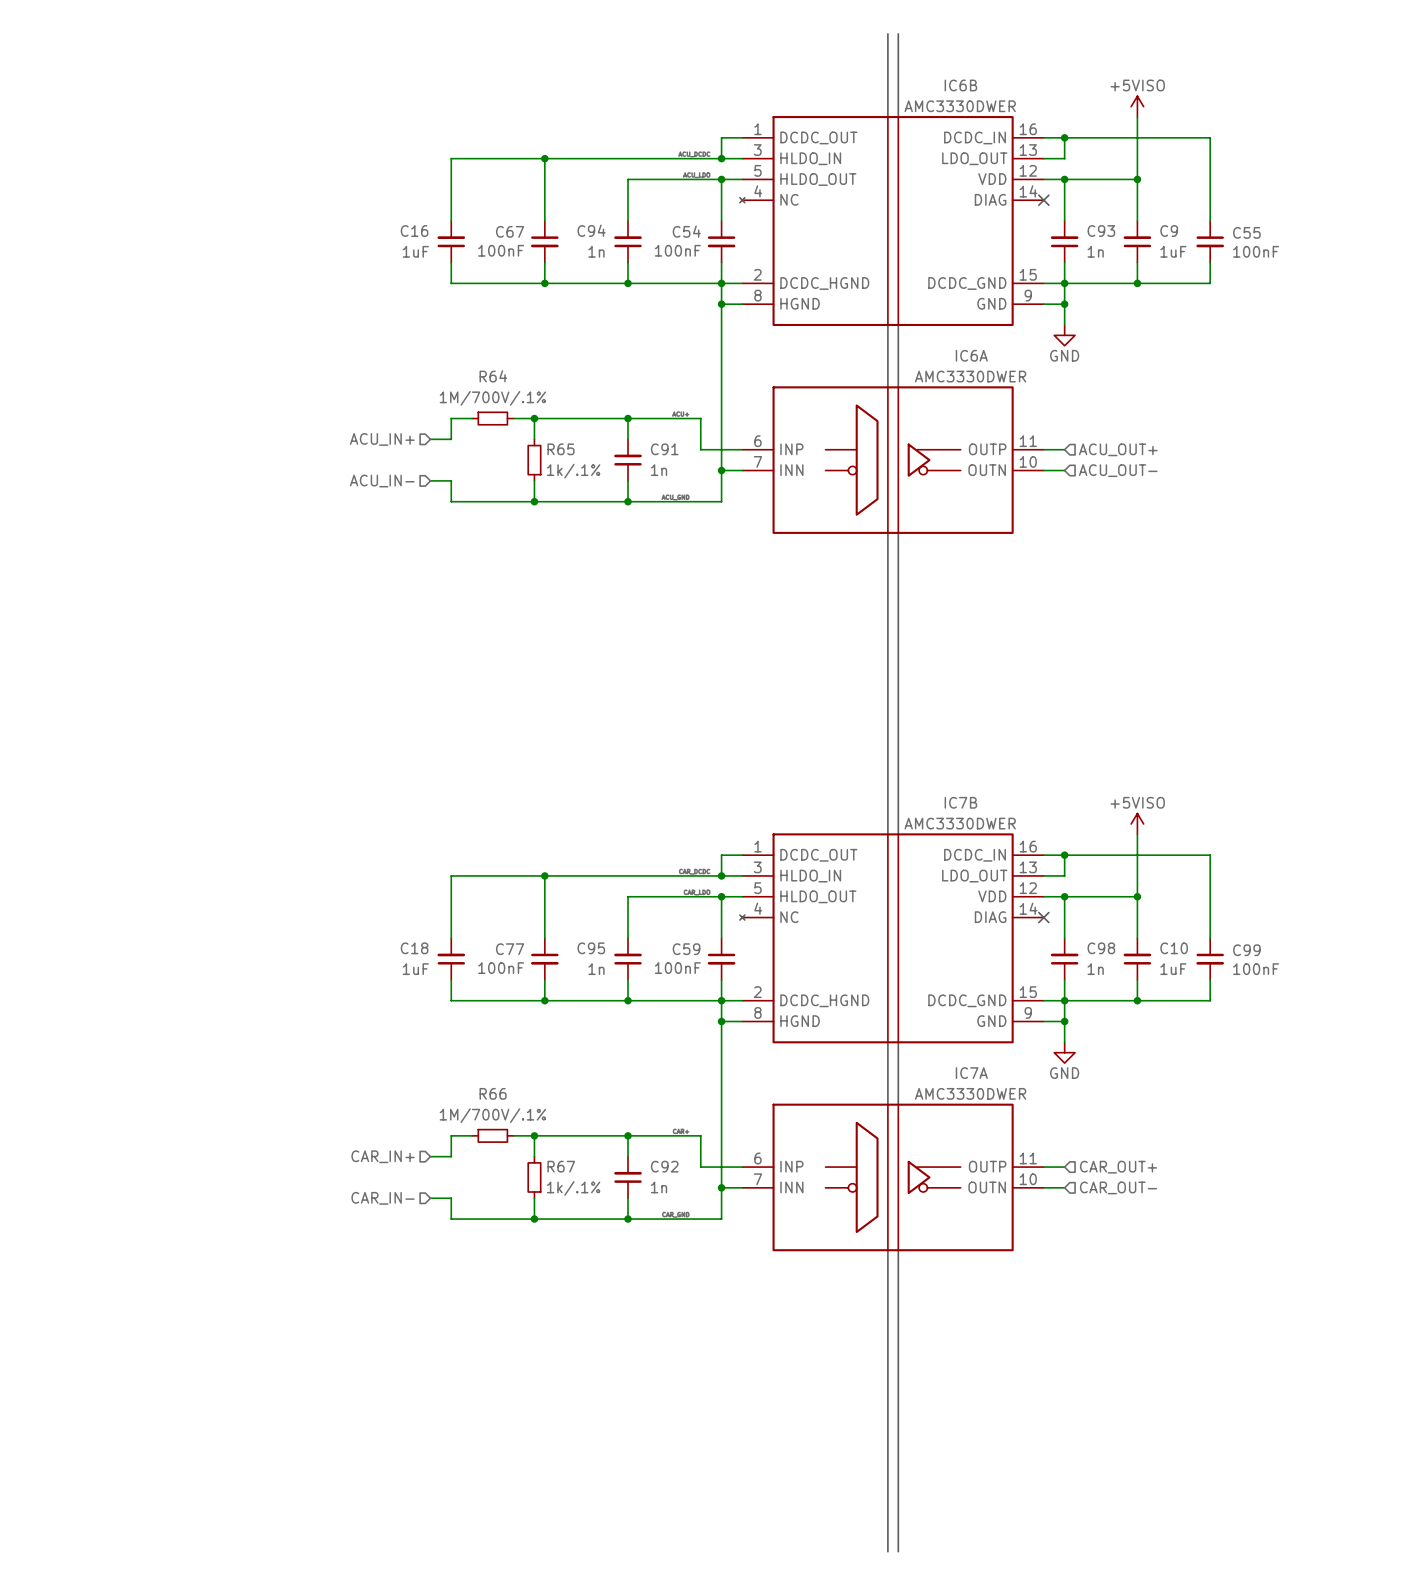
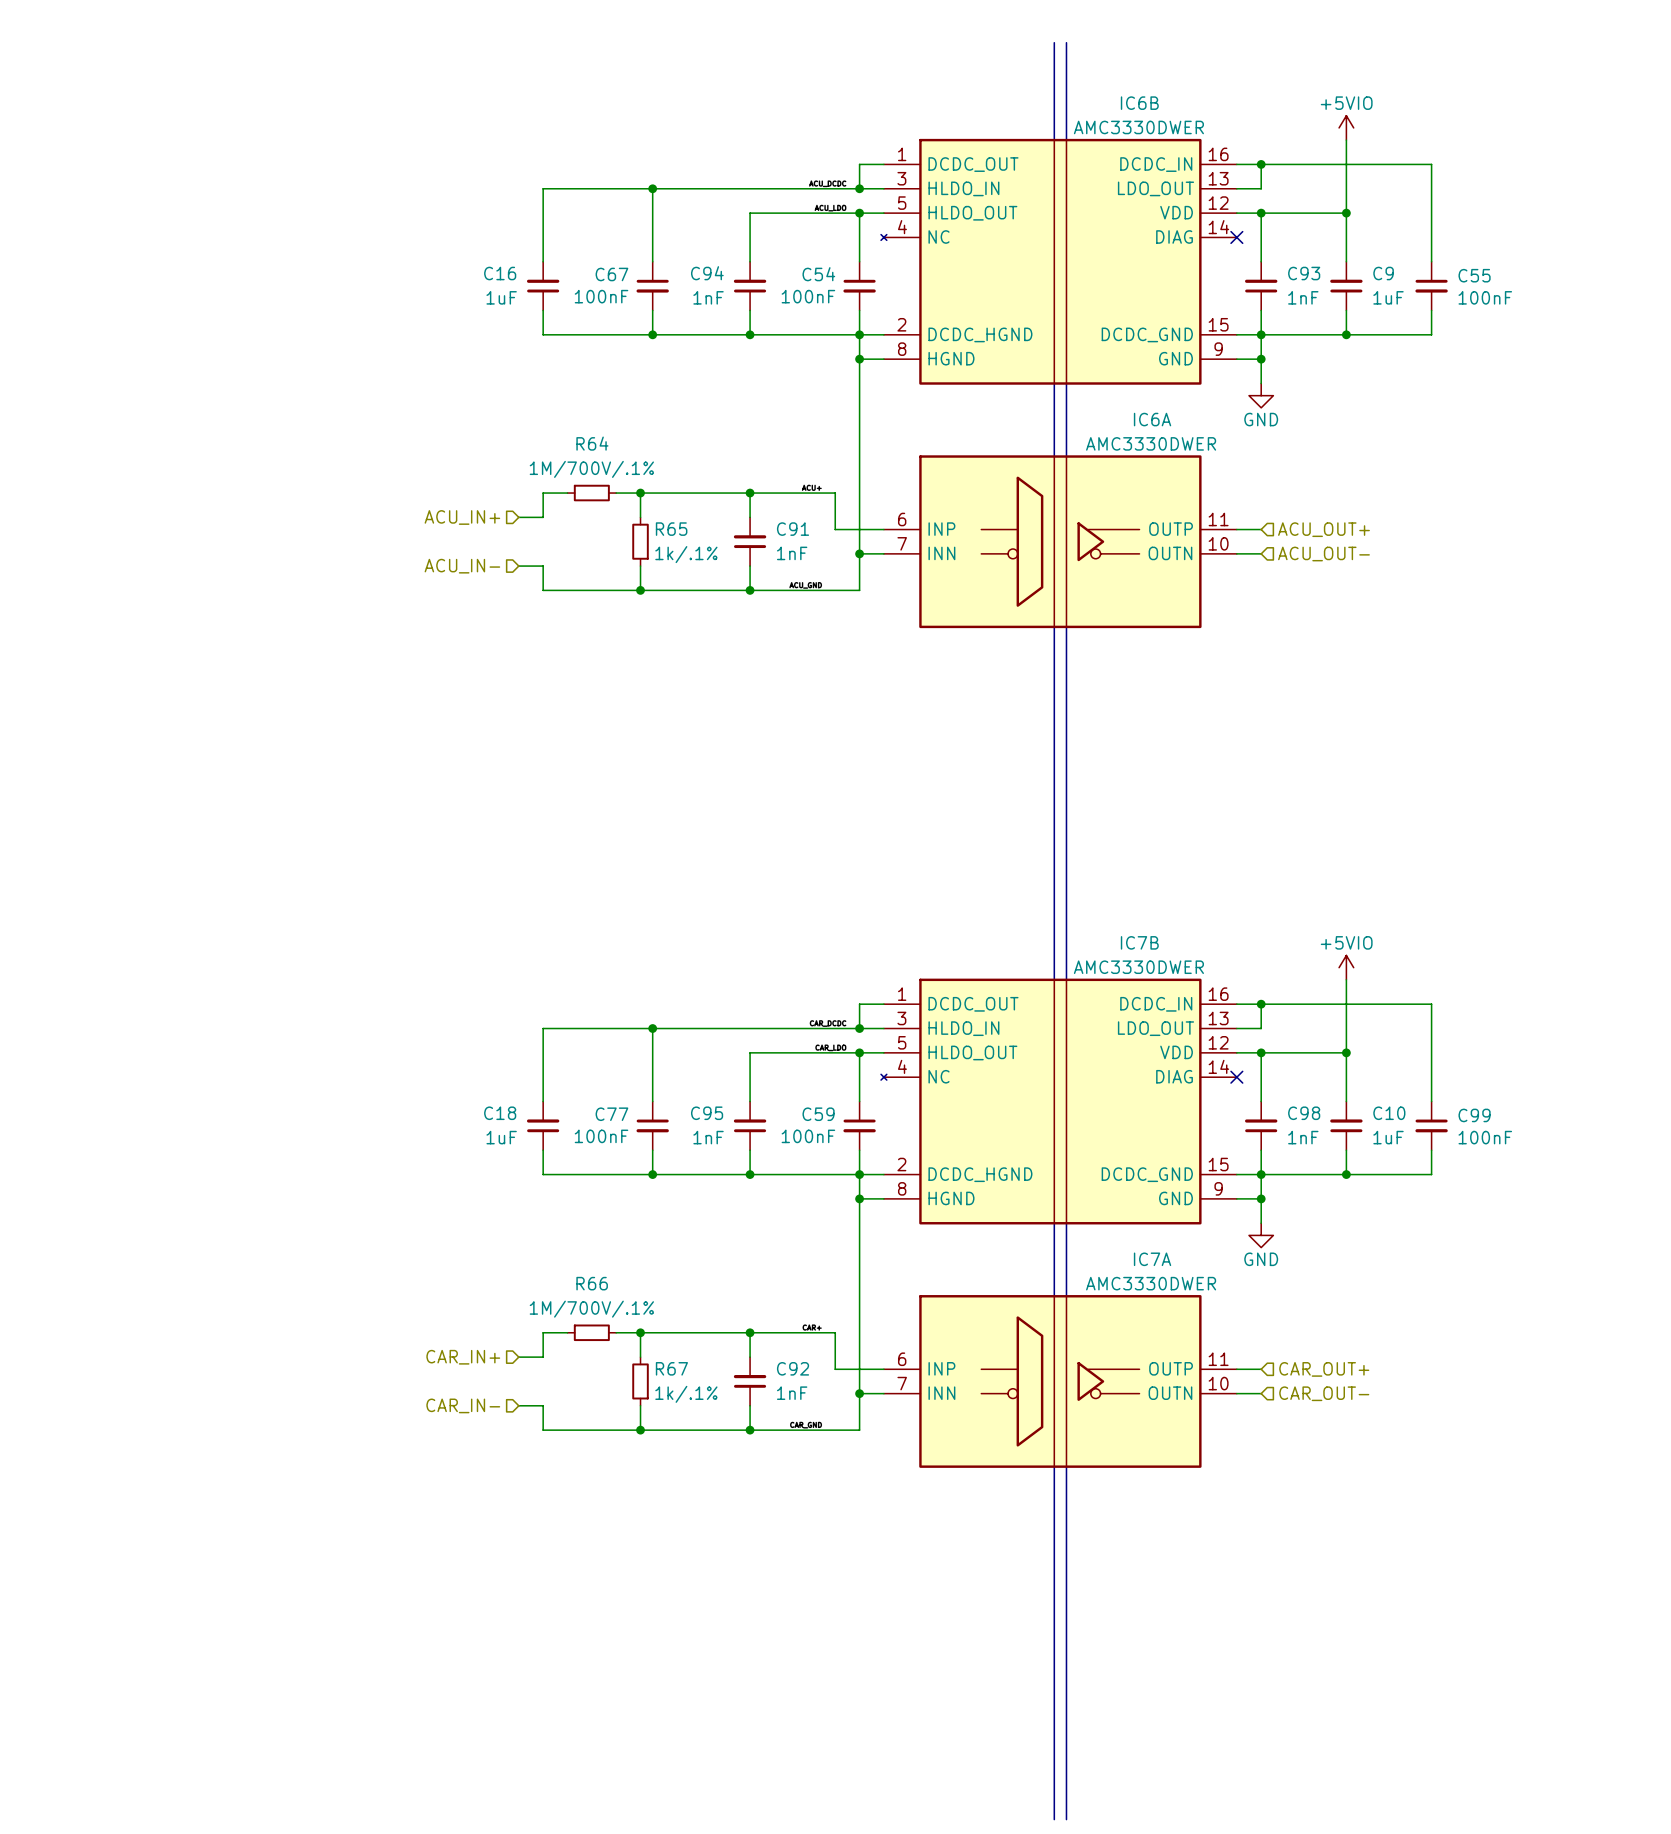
power symbol: +5VISO (1137, 106) -> +5VIO (1346, 127)
C94 value: 1n (596, 251) -> 1nF (708, 297)
C93 value: 1n (1095, 251) -> 1nF (1303, 297)
C91 value: 1n (659, 470) -> 1nF (792, 553)
power symbol: +5VISO (1137, 823) -> +5VIO (1346, 967)
C95 value: 1n (596, 969) -> 1nF (708, 1137)
C98 value: 1n (1095, 969) -> 1nF (1303, 1137)
C92 value: 1n (659, 1187) -> 1nF (792, 1393)

